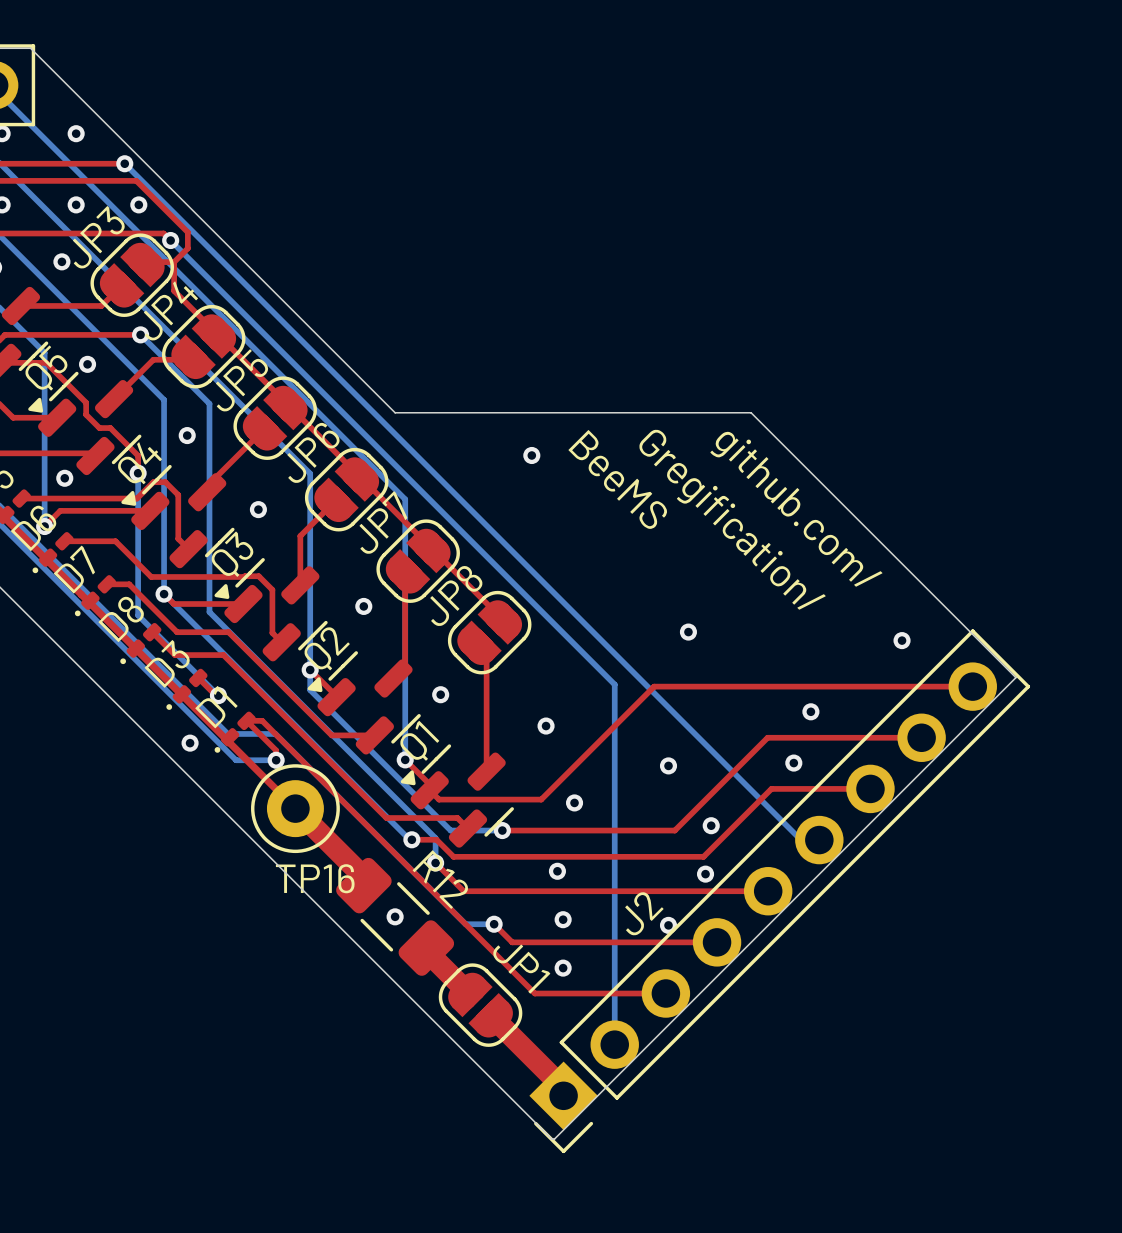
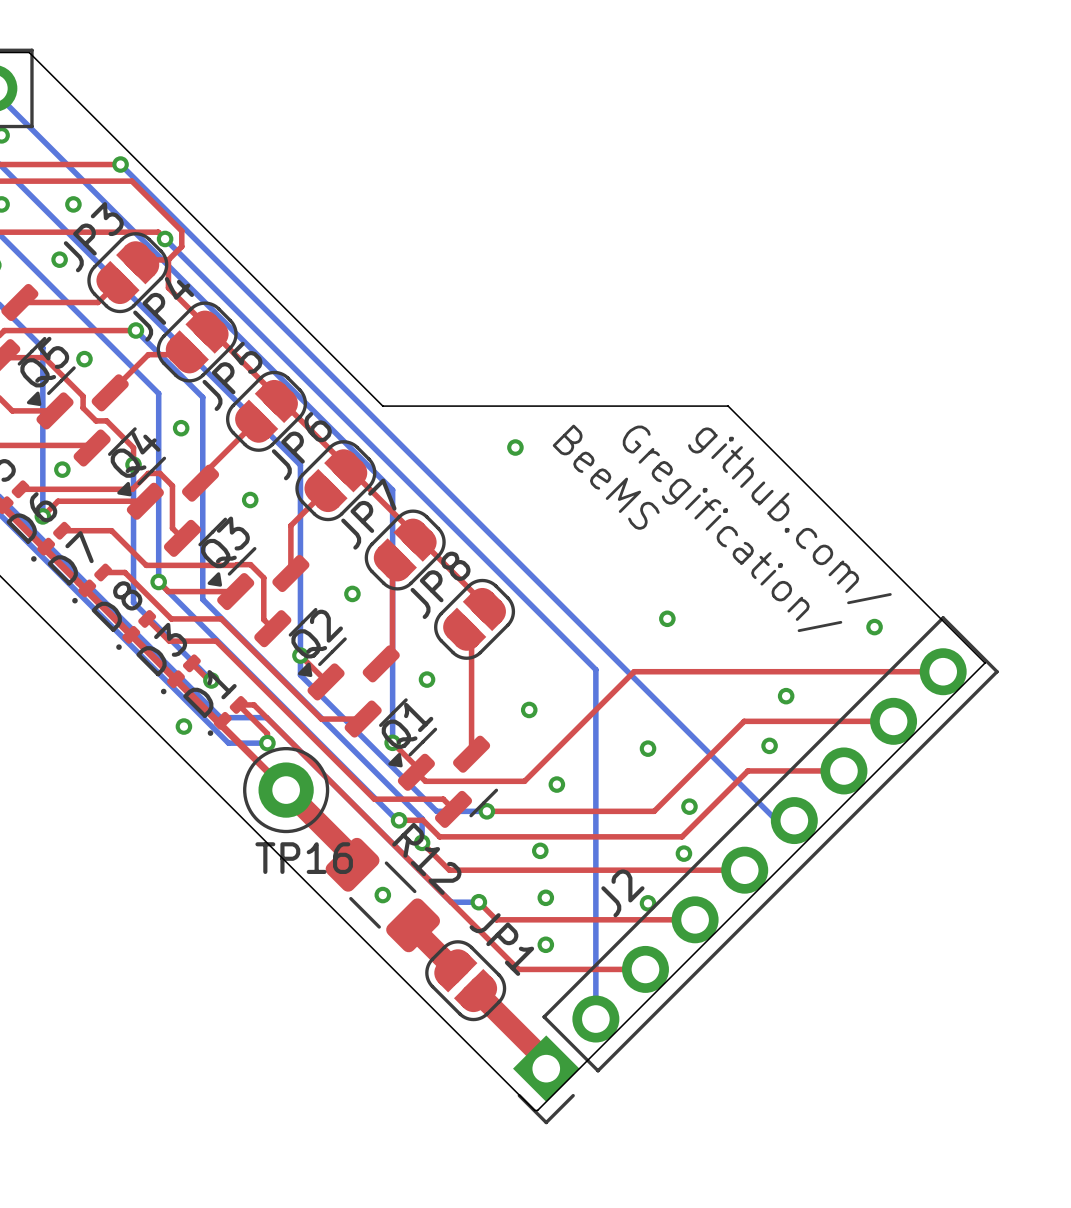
via: (76, 133) -> none
via: (138, 204) -> none

